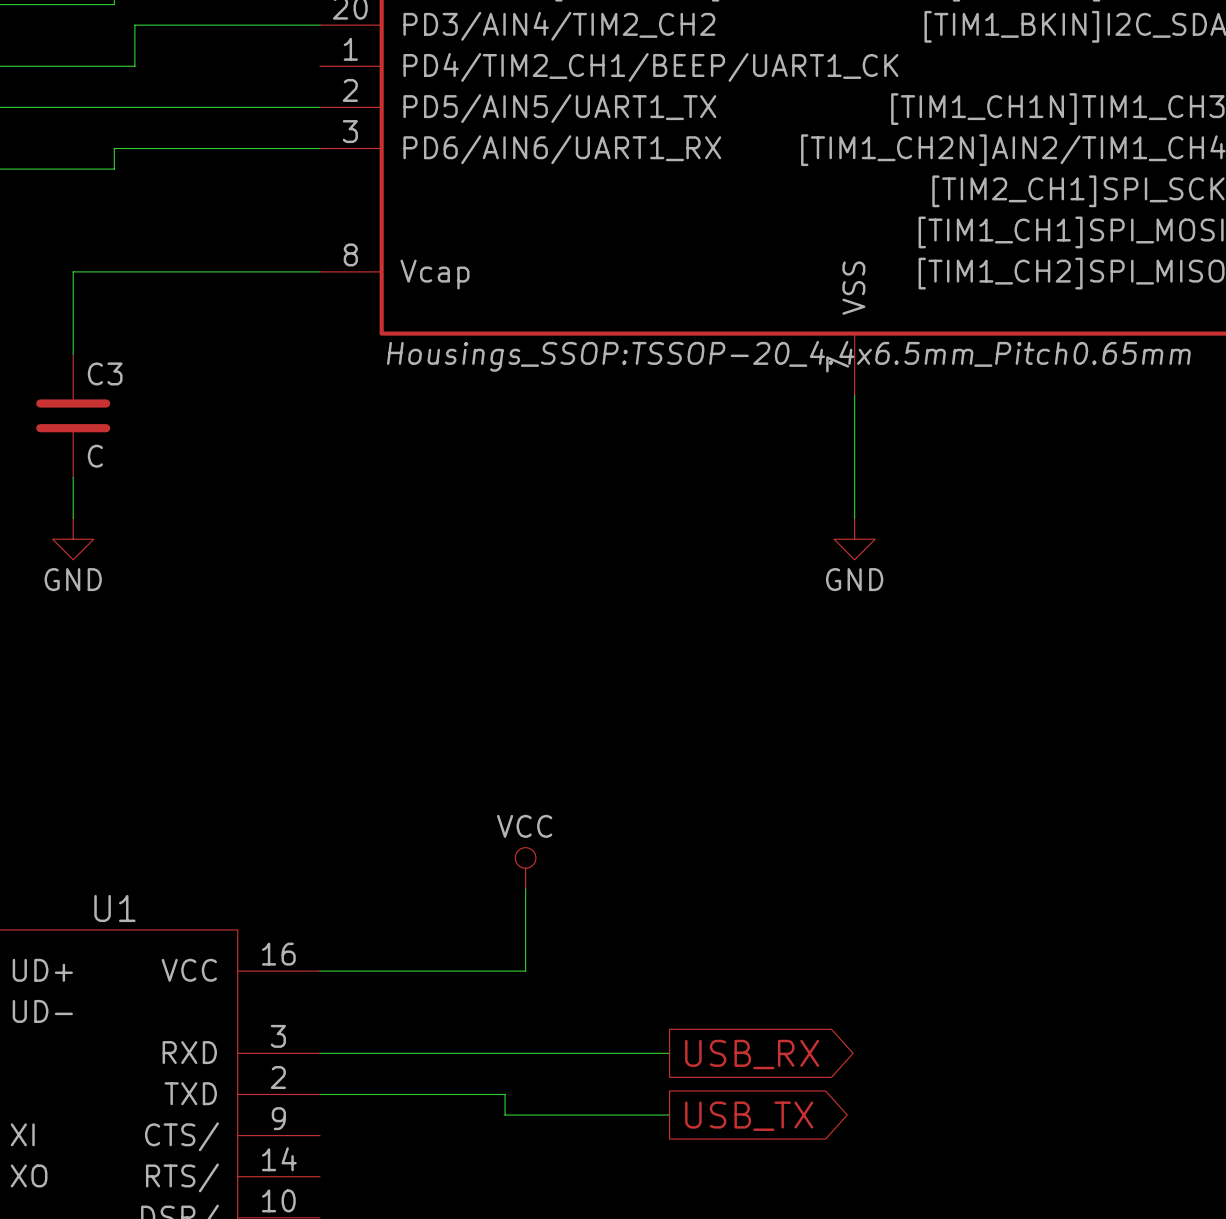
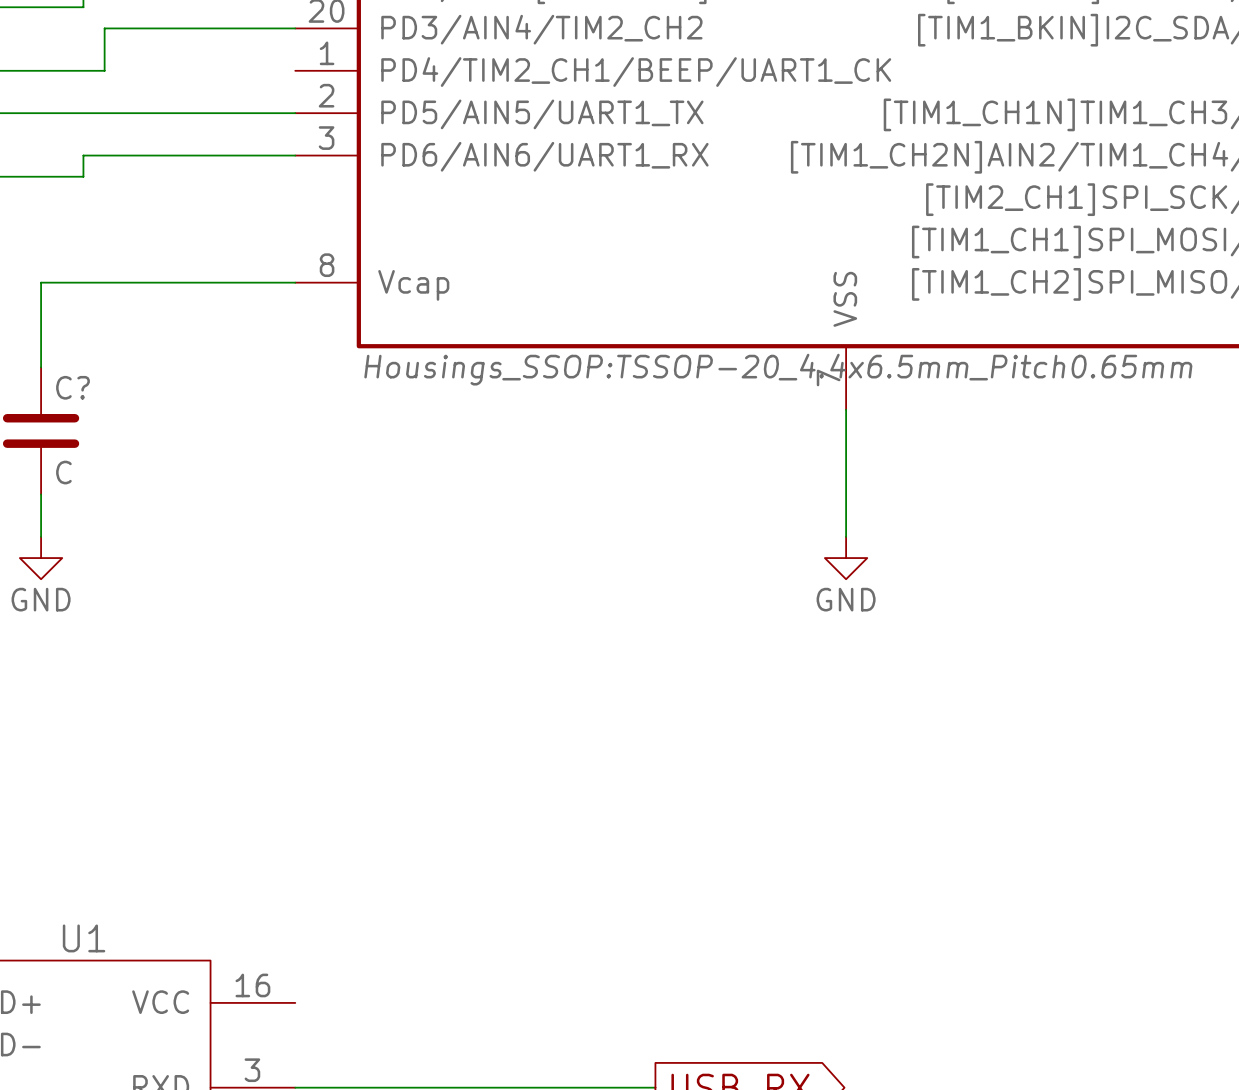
C3 name: C3 (105, 373) -> C? (73, 387)
power symbol: VCC (525, 868) -> none
wire: (525, 888) (525, 971) (319, 971) -> none

